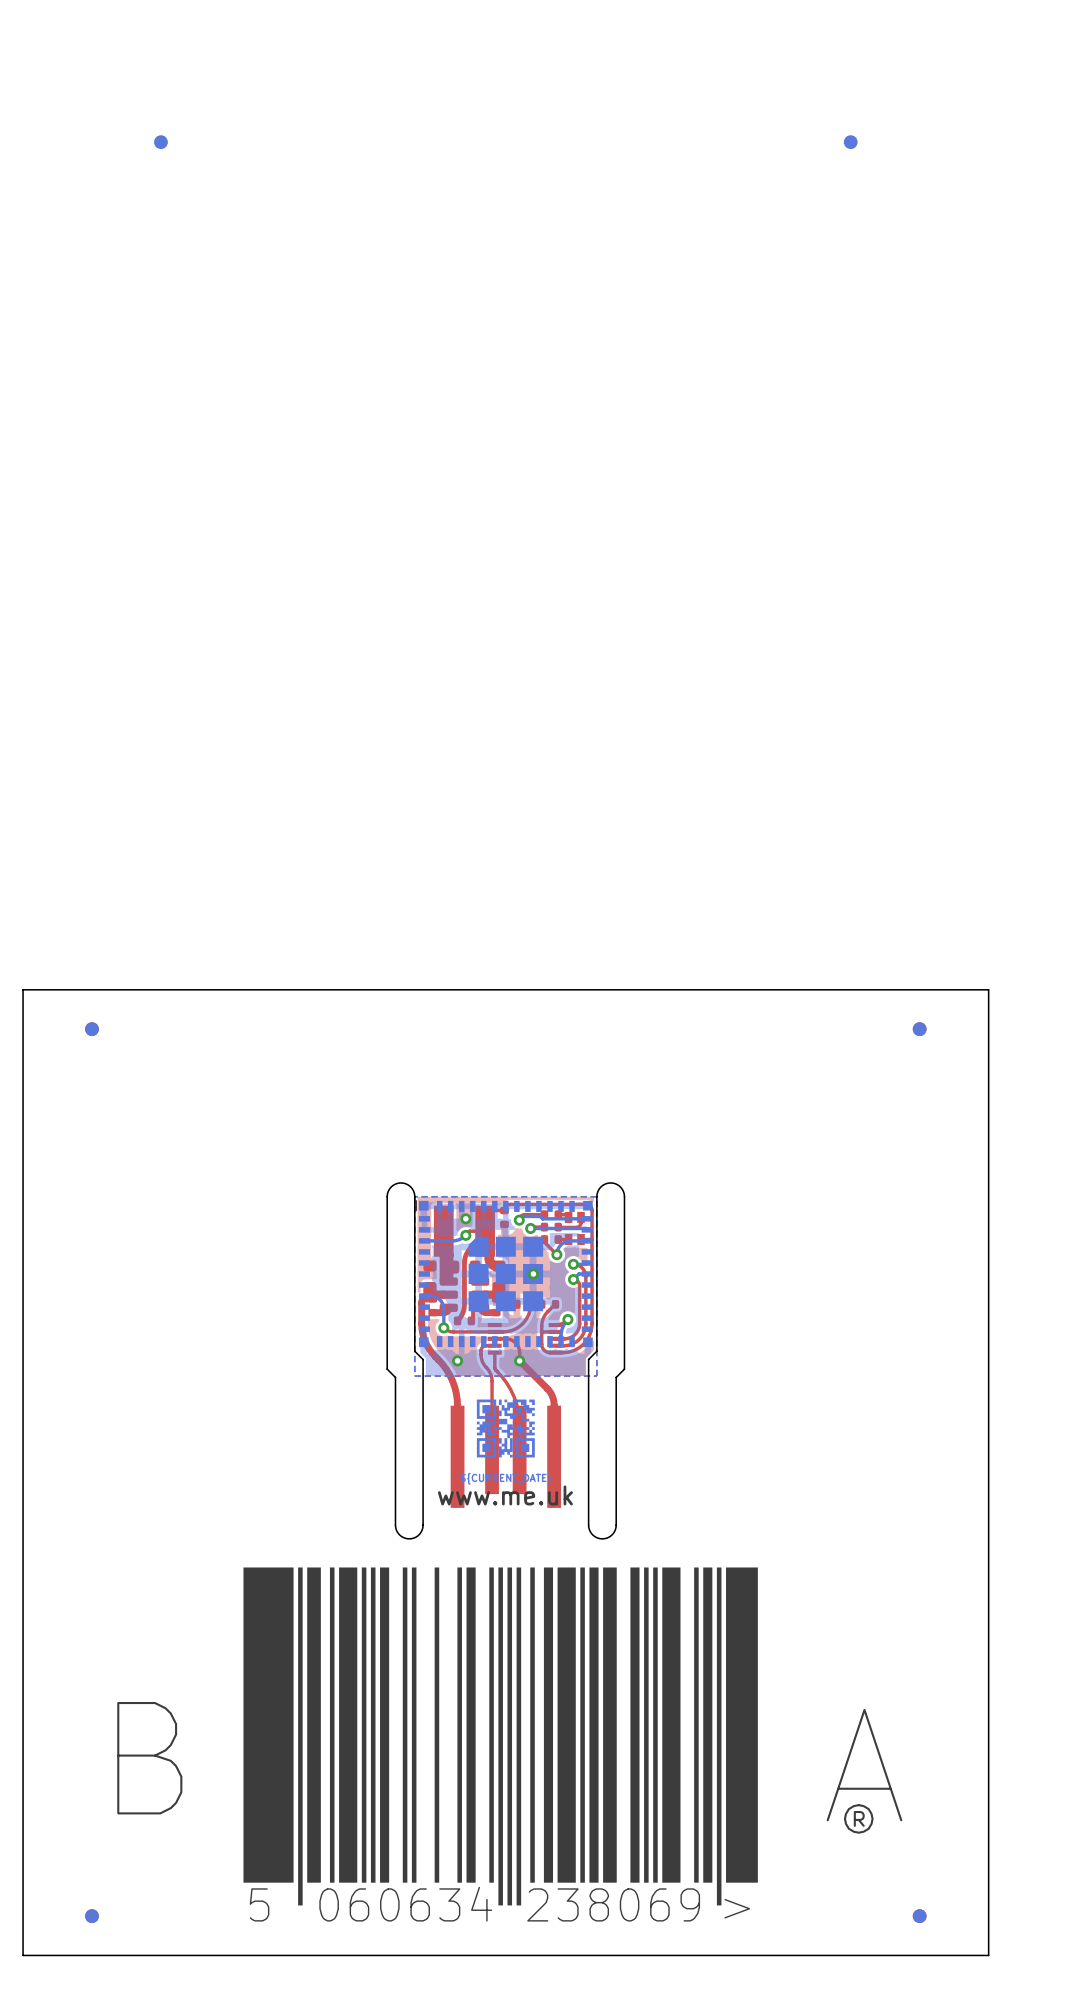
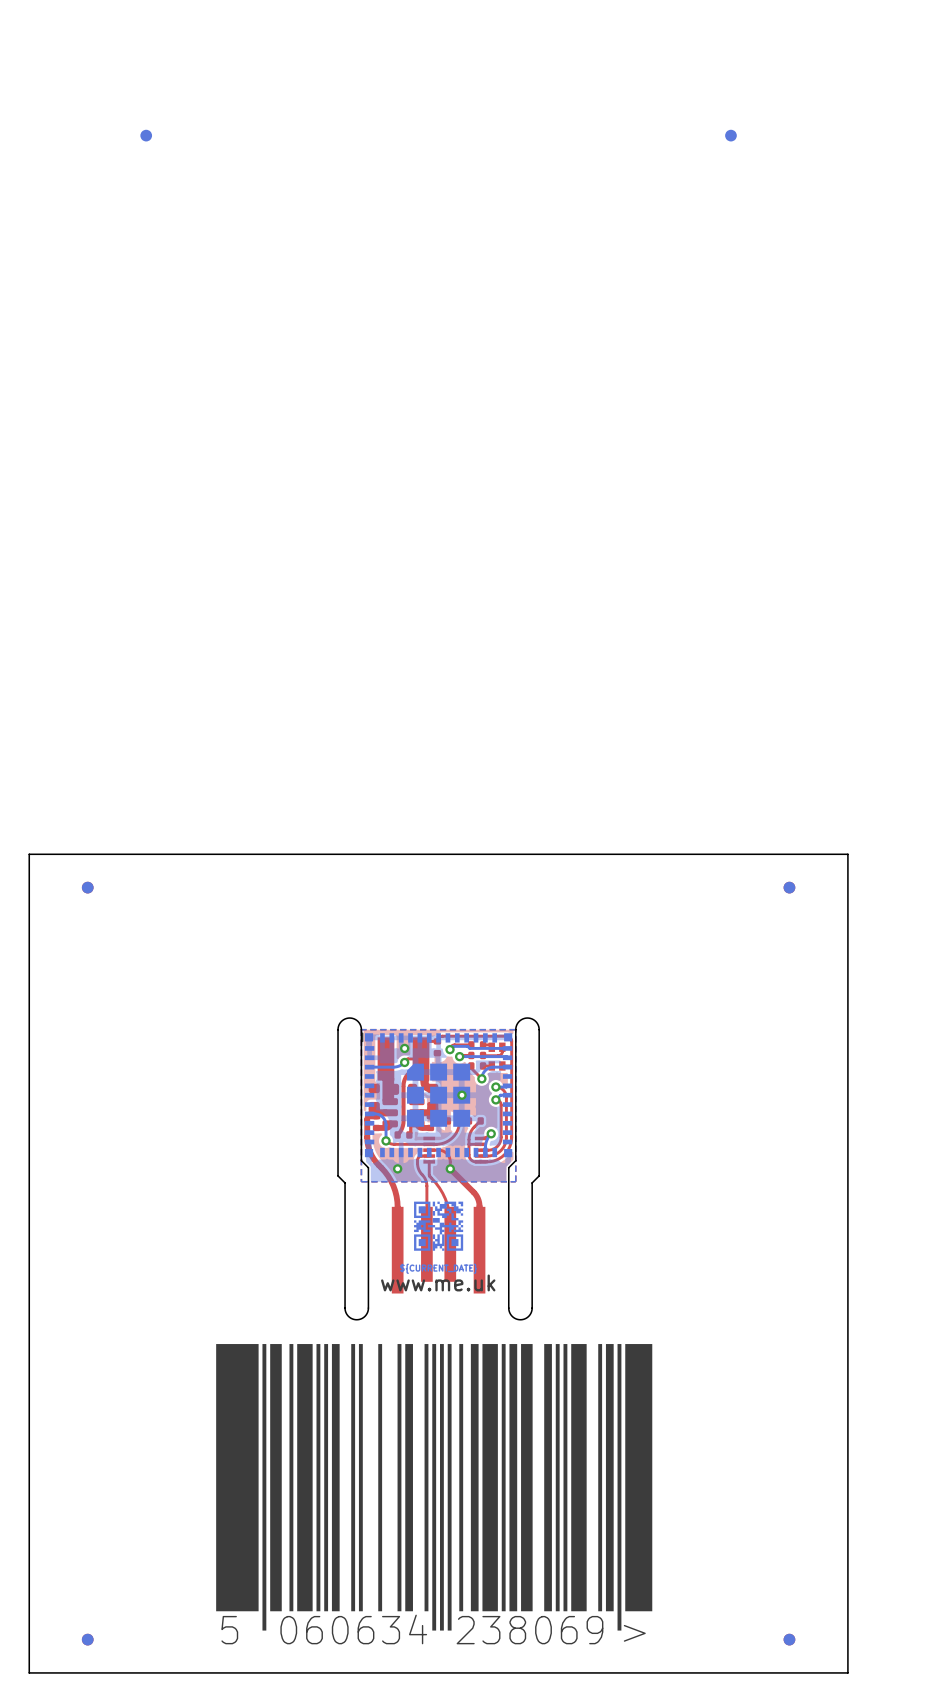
text: B (149, 1758) -> none
text: A (864, 1765) -> none
text: ® (858, 1818) -> none

